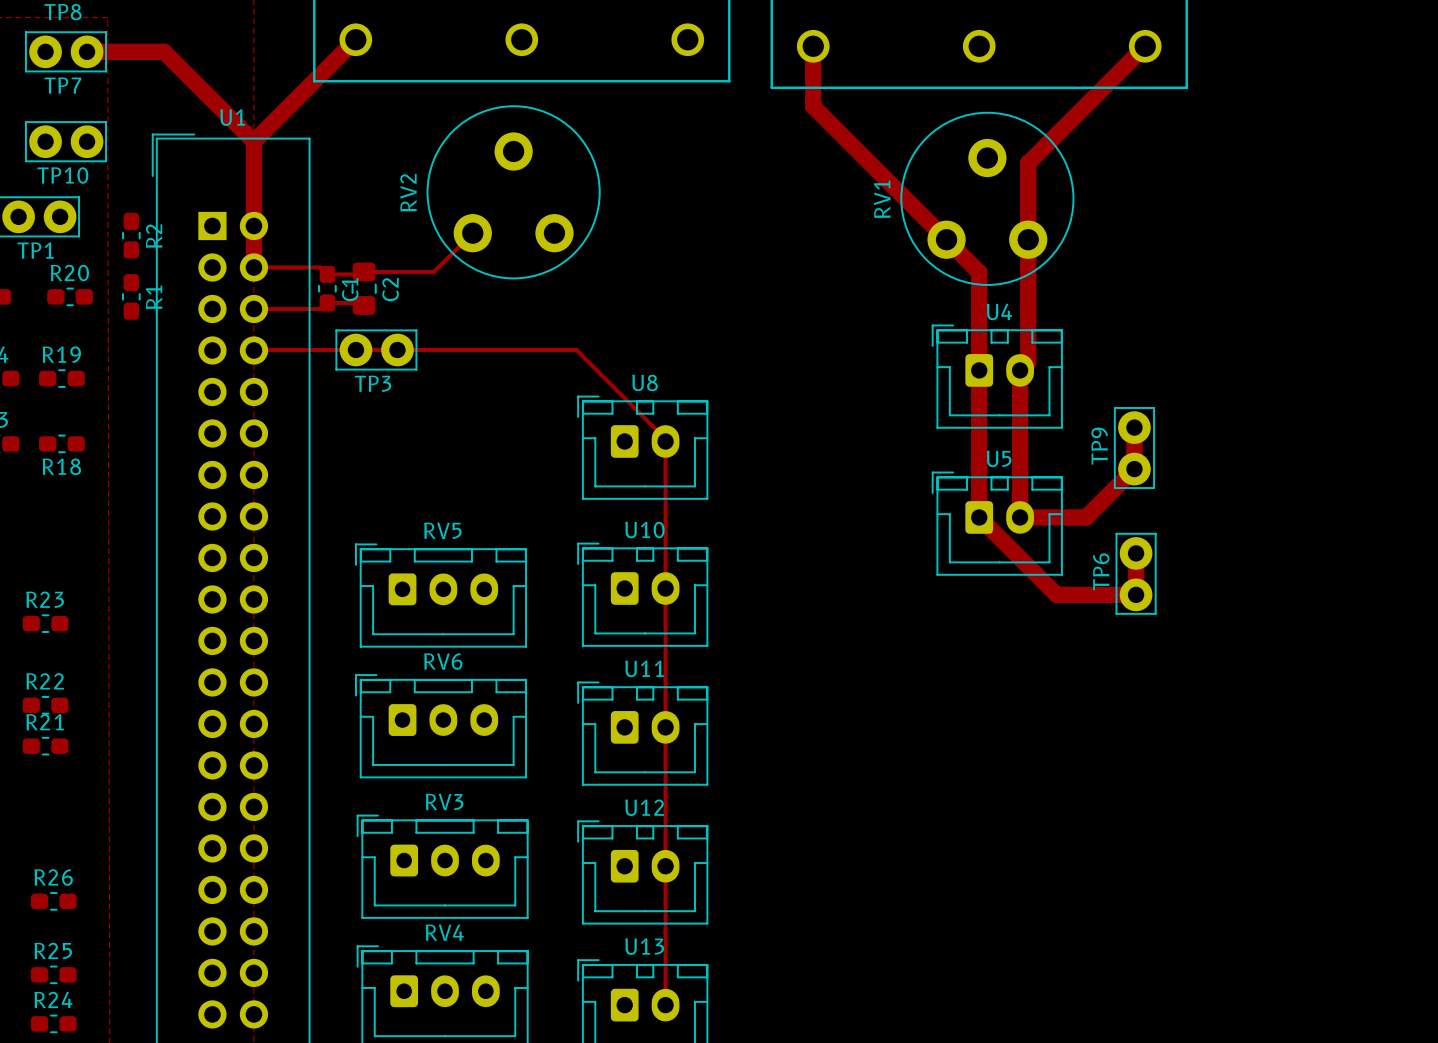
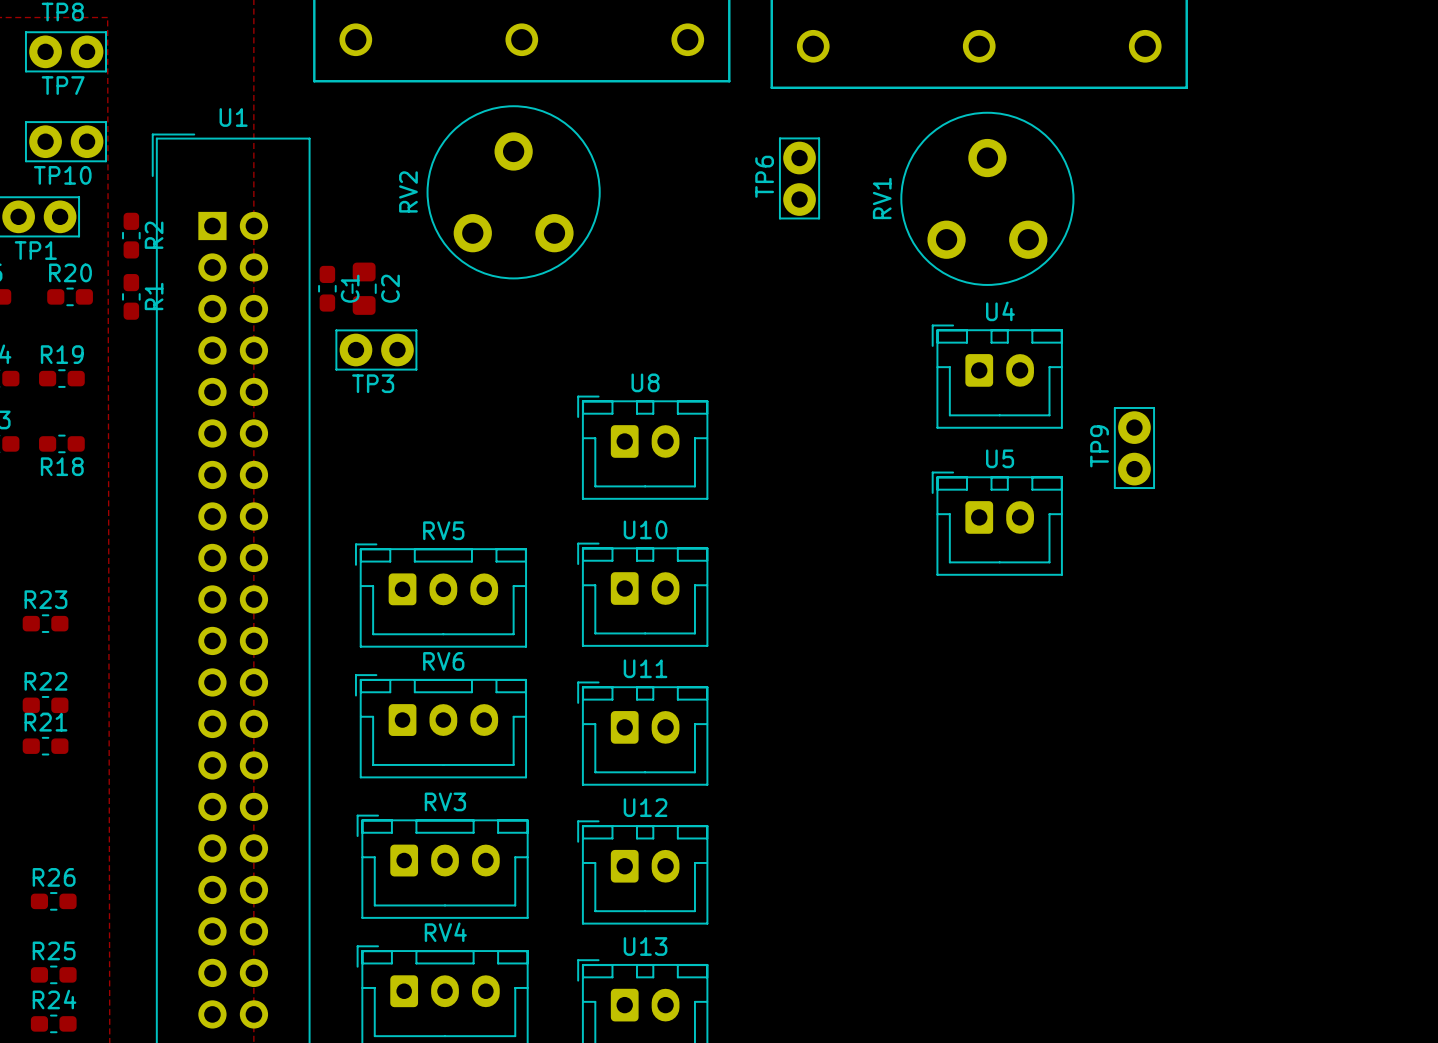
track: (355, 39) (253, 141) -> none
track: (813, 46) (813, 106) (979, 272) (979, 517) (1056, 594) (1136, 594) (1136, 553) -> none
track: (1145, 46) (1028, 163) (1028, 362) (1020, 370) (1020, 517) (1086, 517) (1134, 469) (1134, 427) -> none
track: (87, 51) (164, 51) (253, 141) -> none
track: (253, 141) (253, 267) (320, 267) (327, 274) (361, 274) (364, 271) (433, 271) (472, 233) -> none
track: (364, 305) (361, 303) (327, 303) (321, 308) (253, 308) -> none
track: (253, 350) (576, 349) (665, 439) (665, 1005) -> none
TP6 position: (1136, 573) -> (799, 178)

